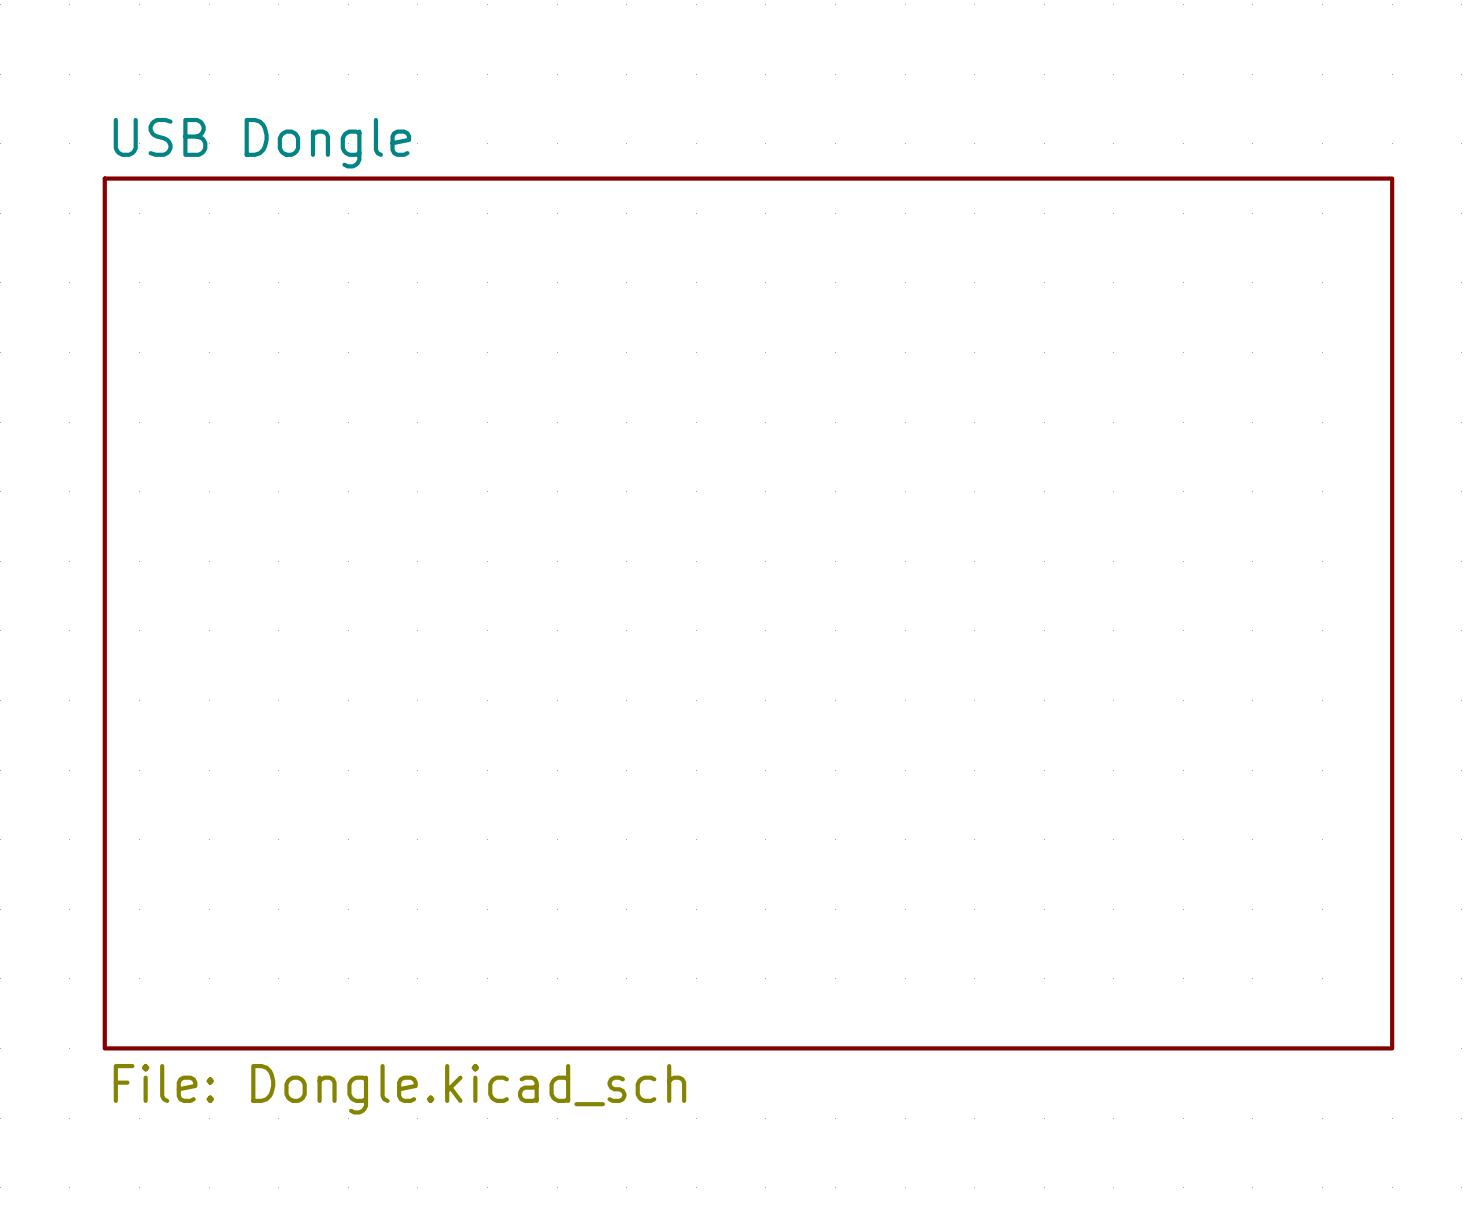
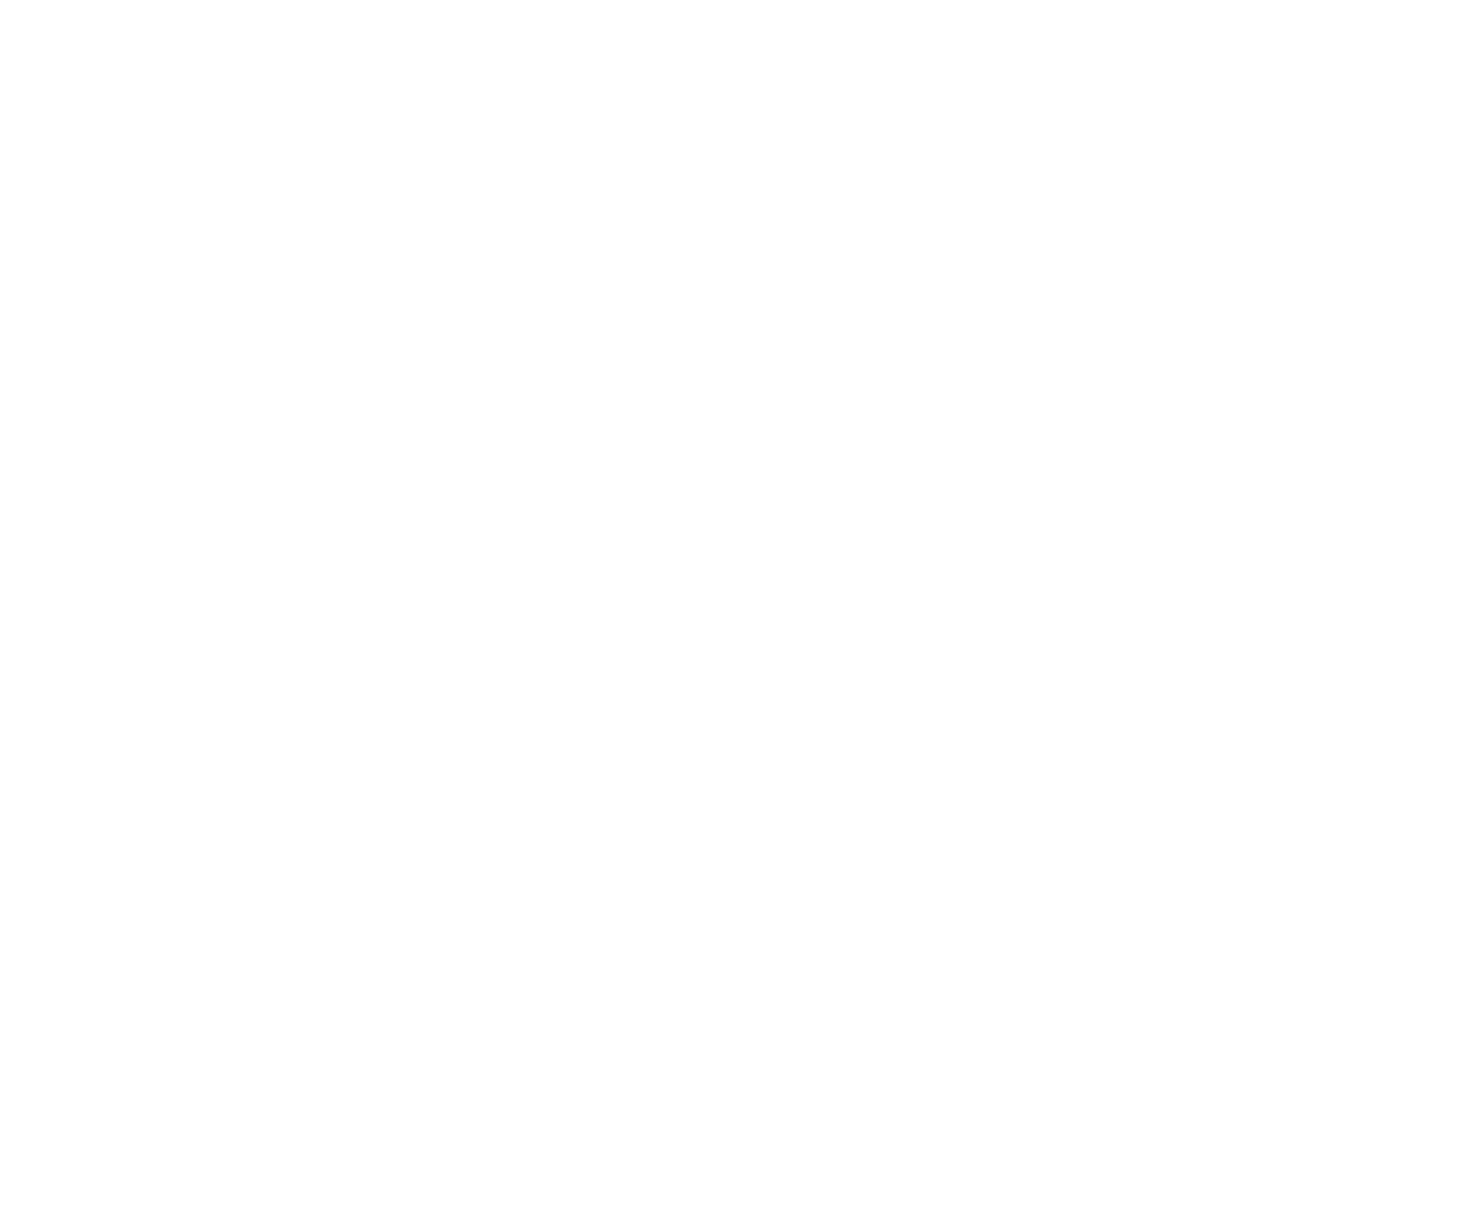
sheet USB Dongle: File: Dongle.kicad_sch (748, 613) -> none

